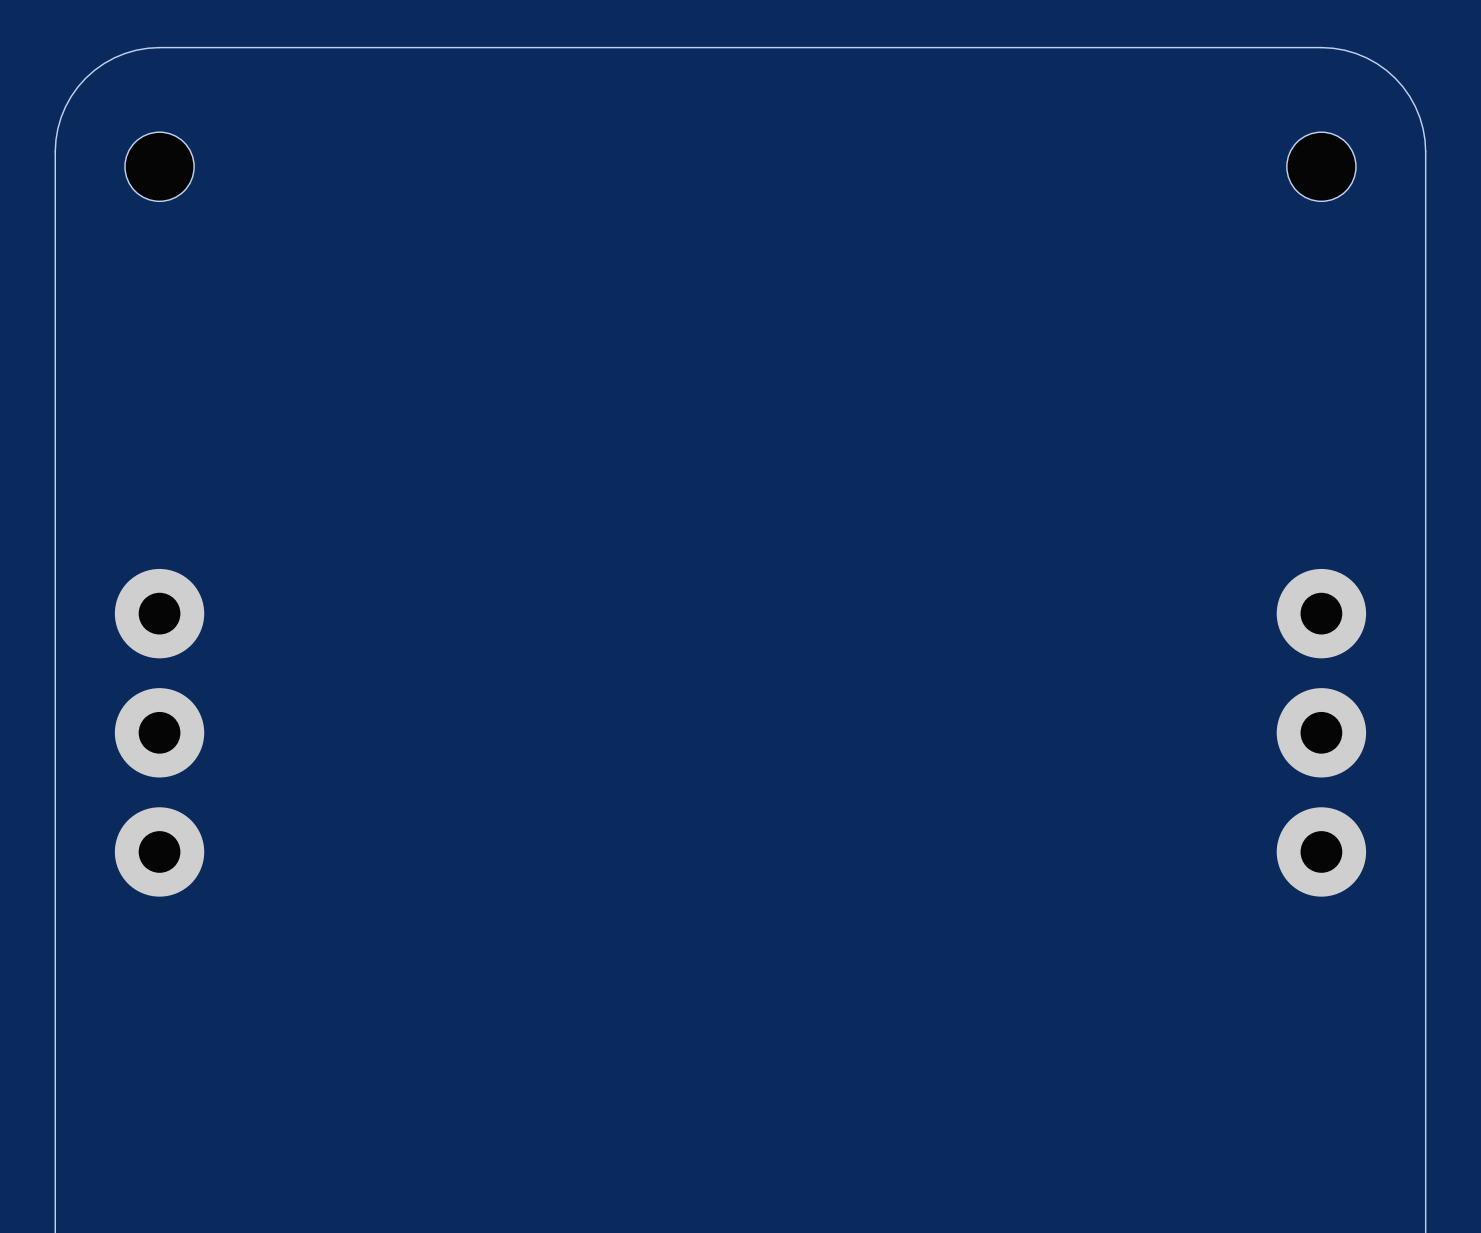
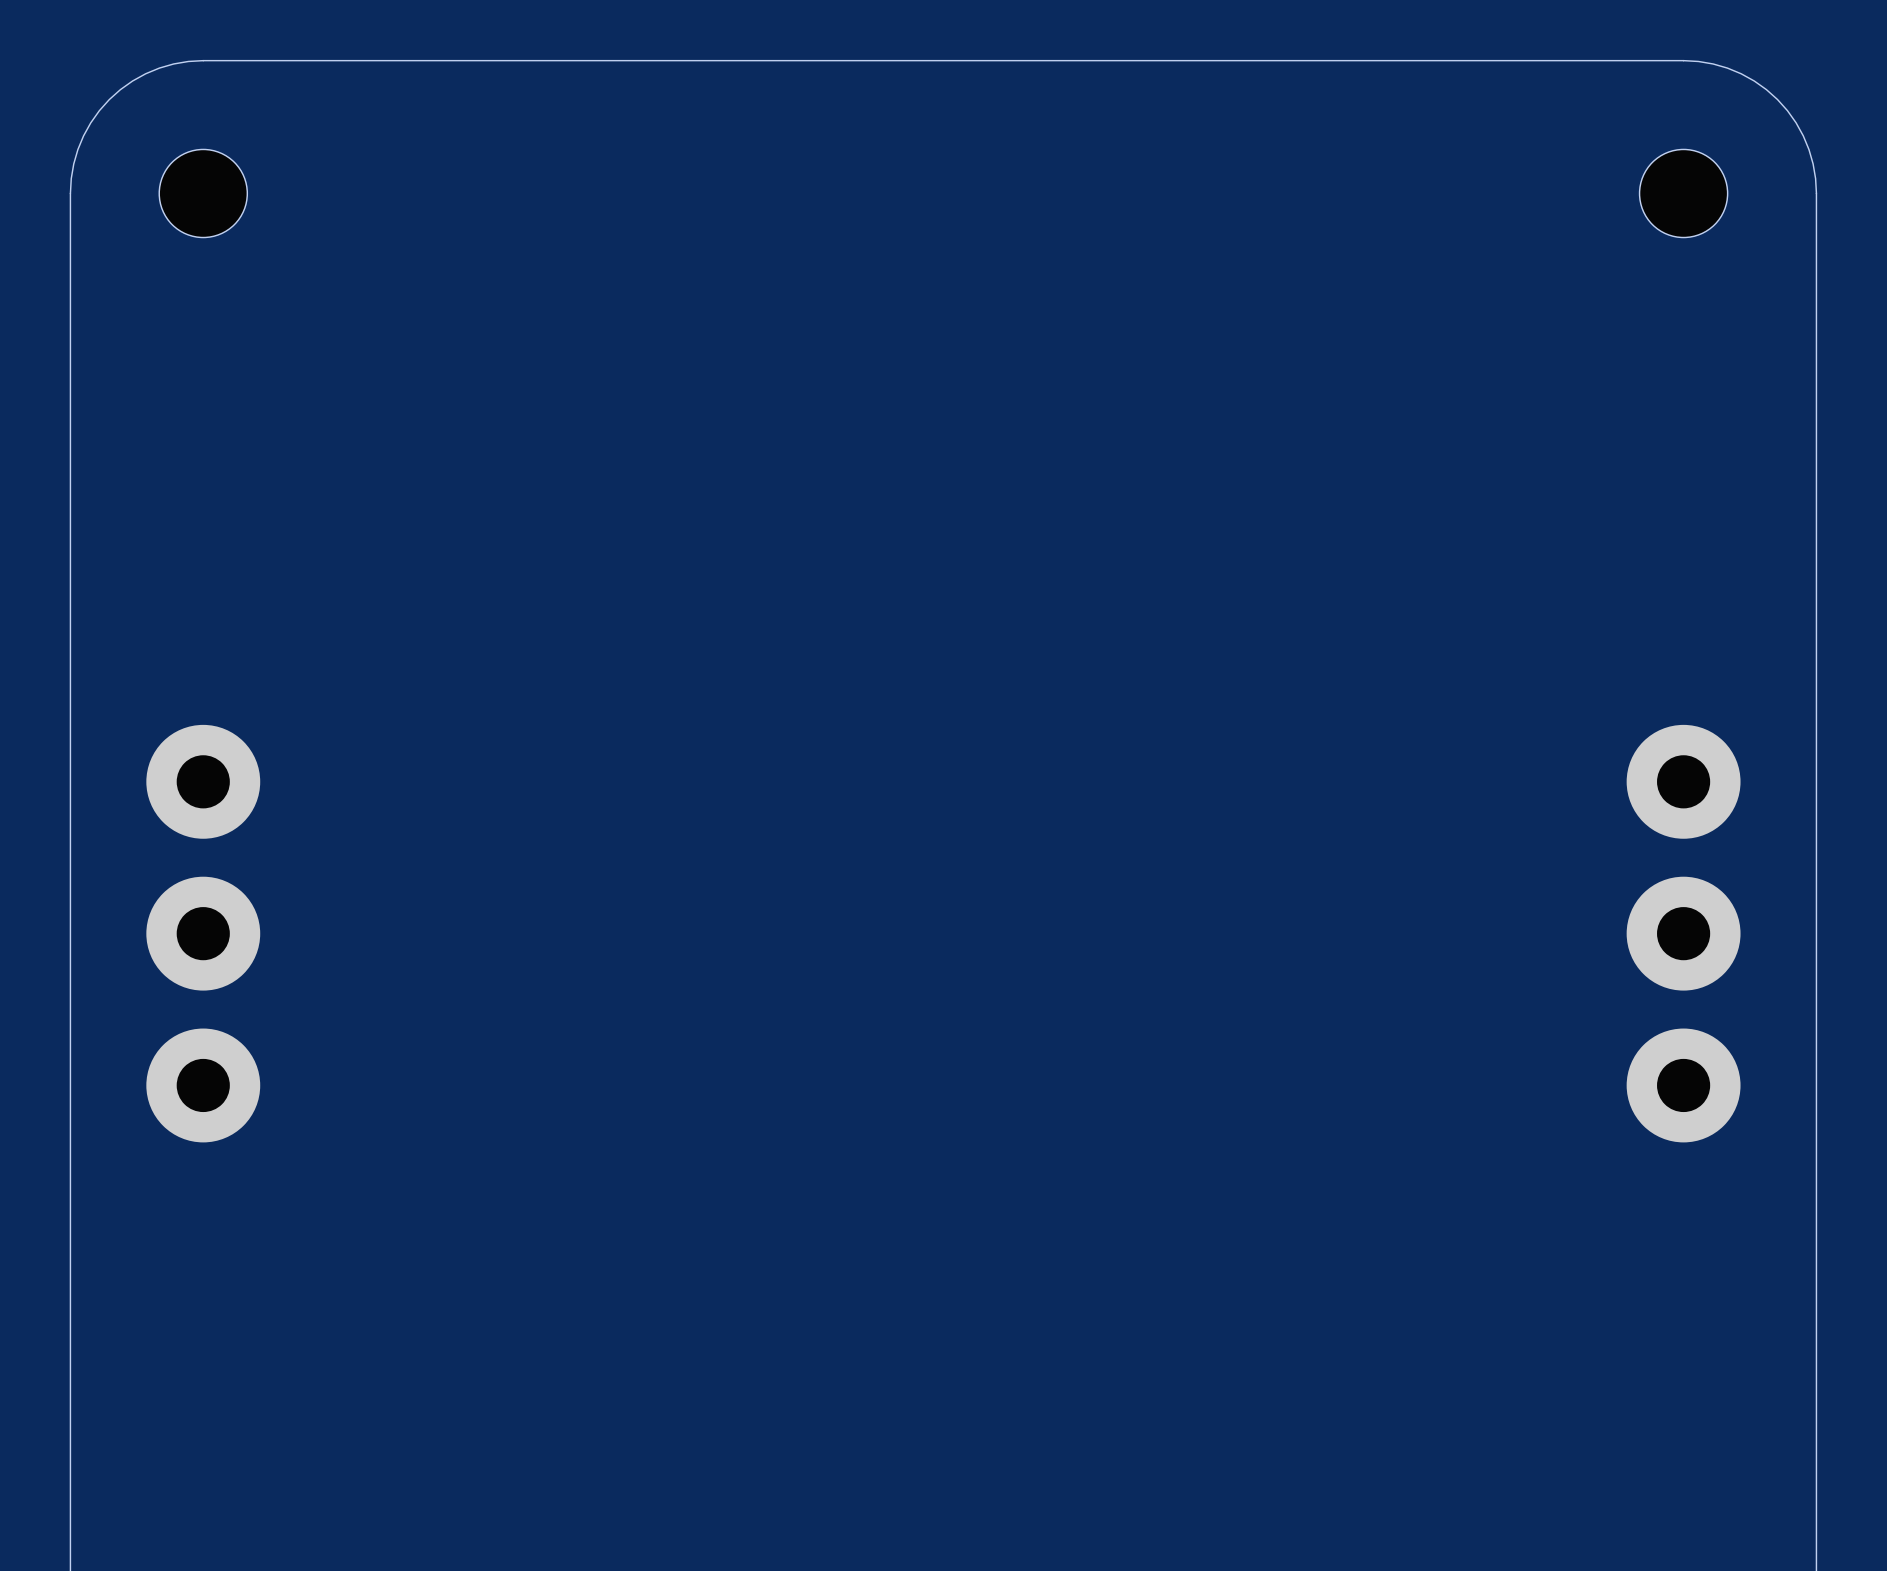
hole position: (159, 166) -> (203, 193)
hole position: (1321, 166) -> (1683, 193)

